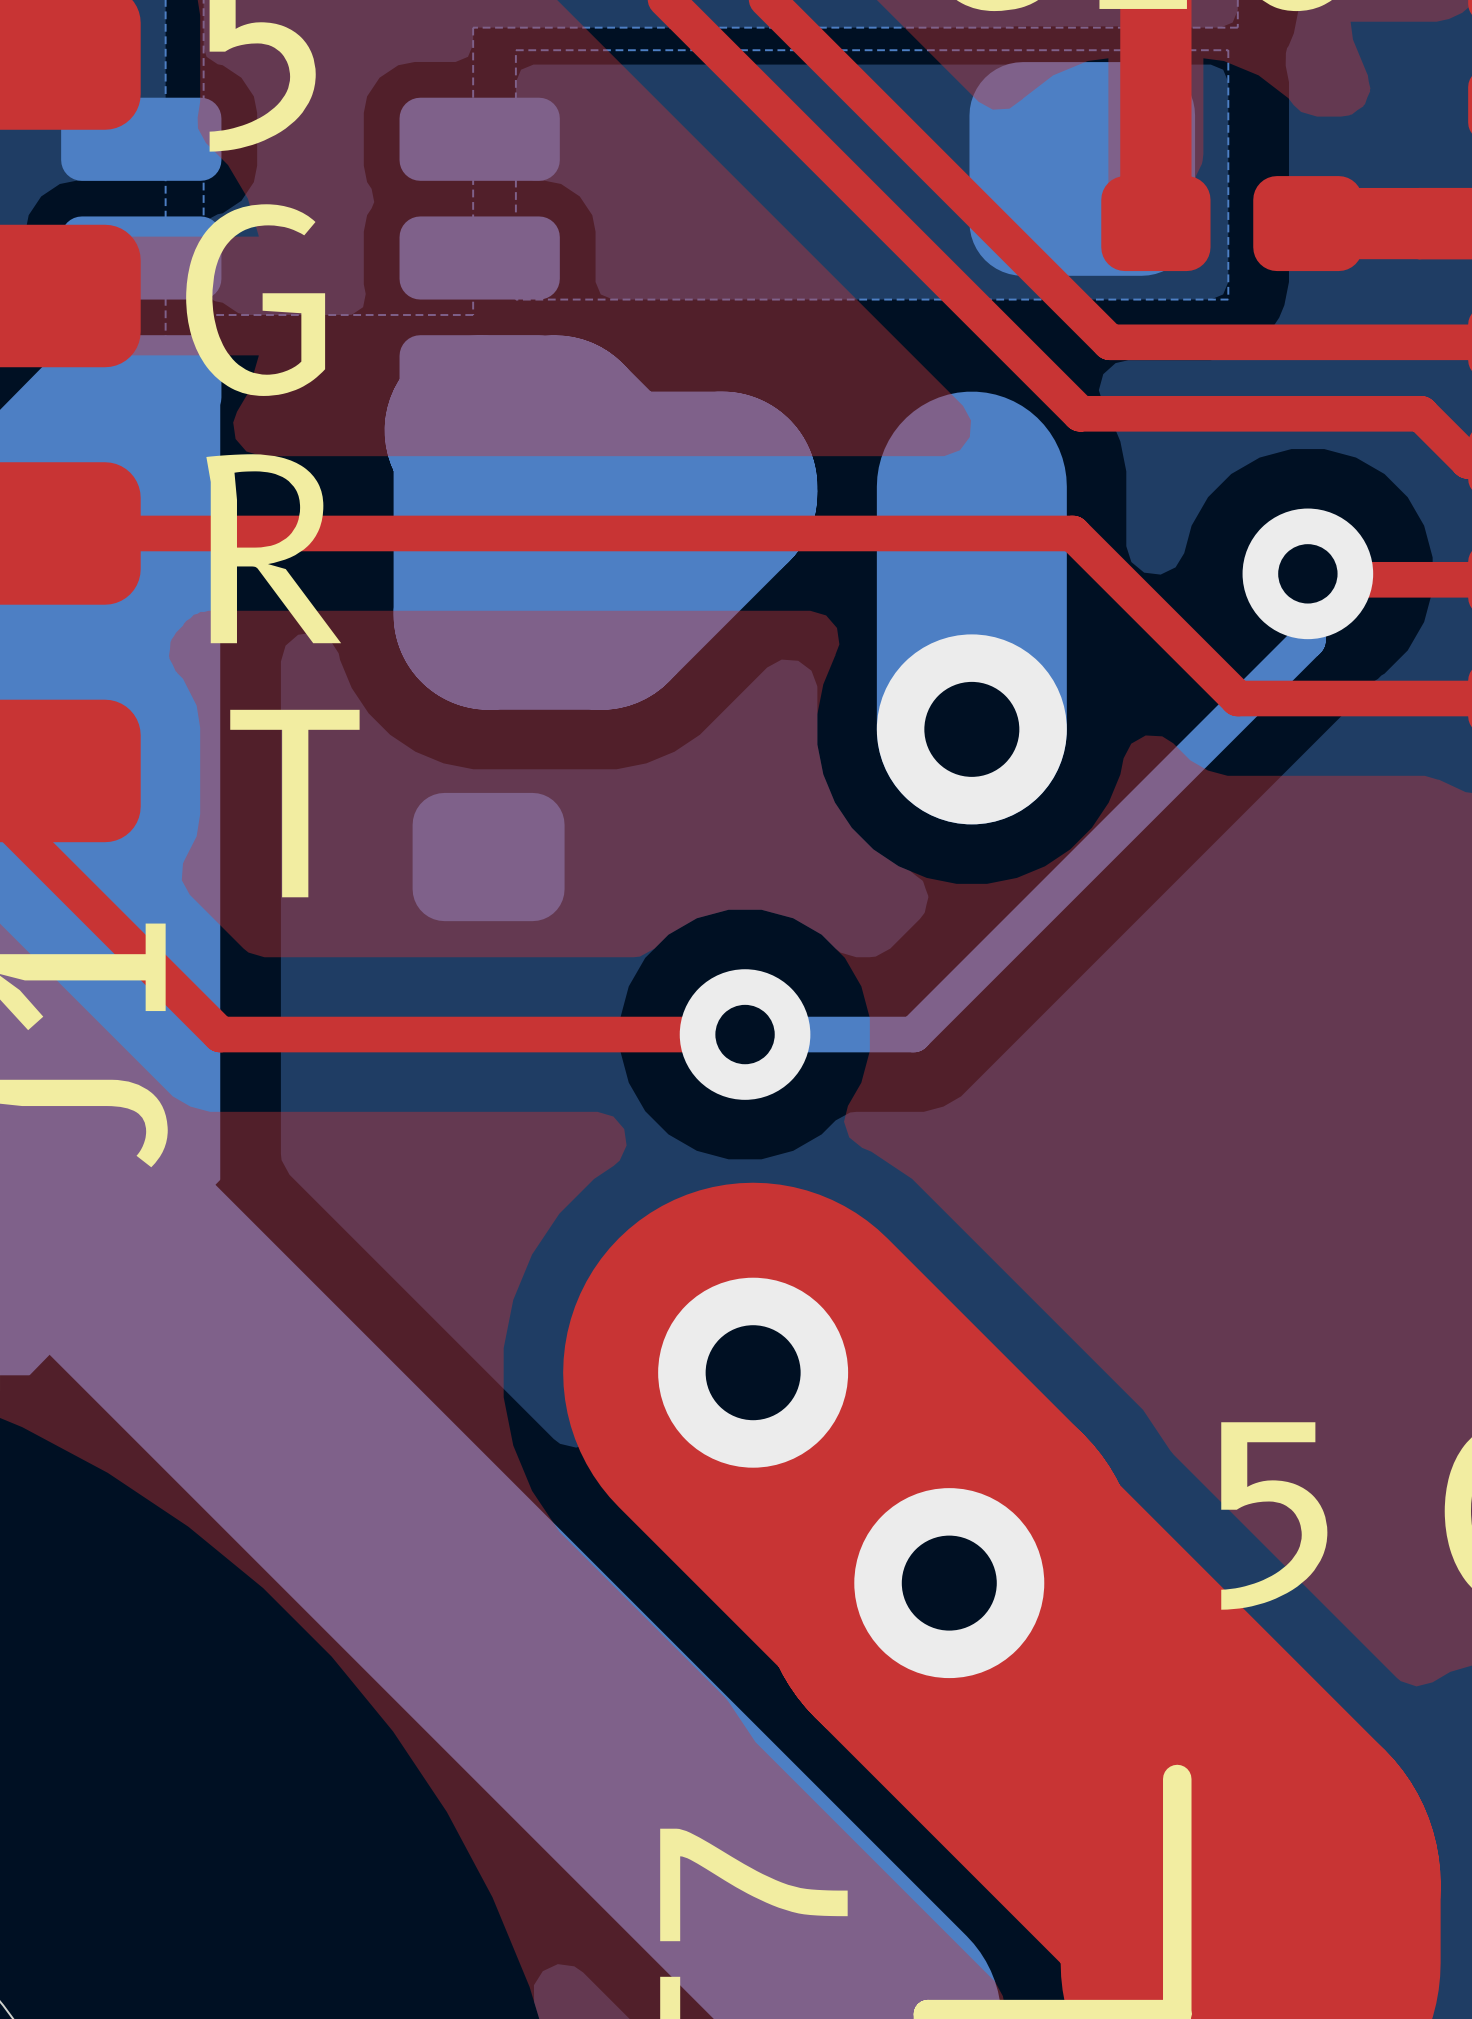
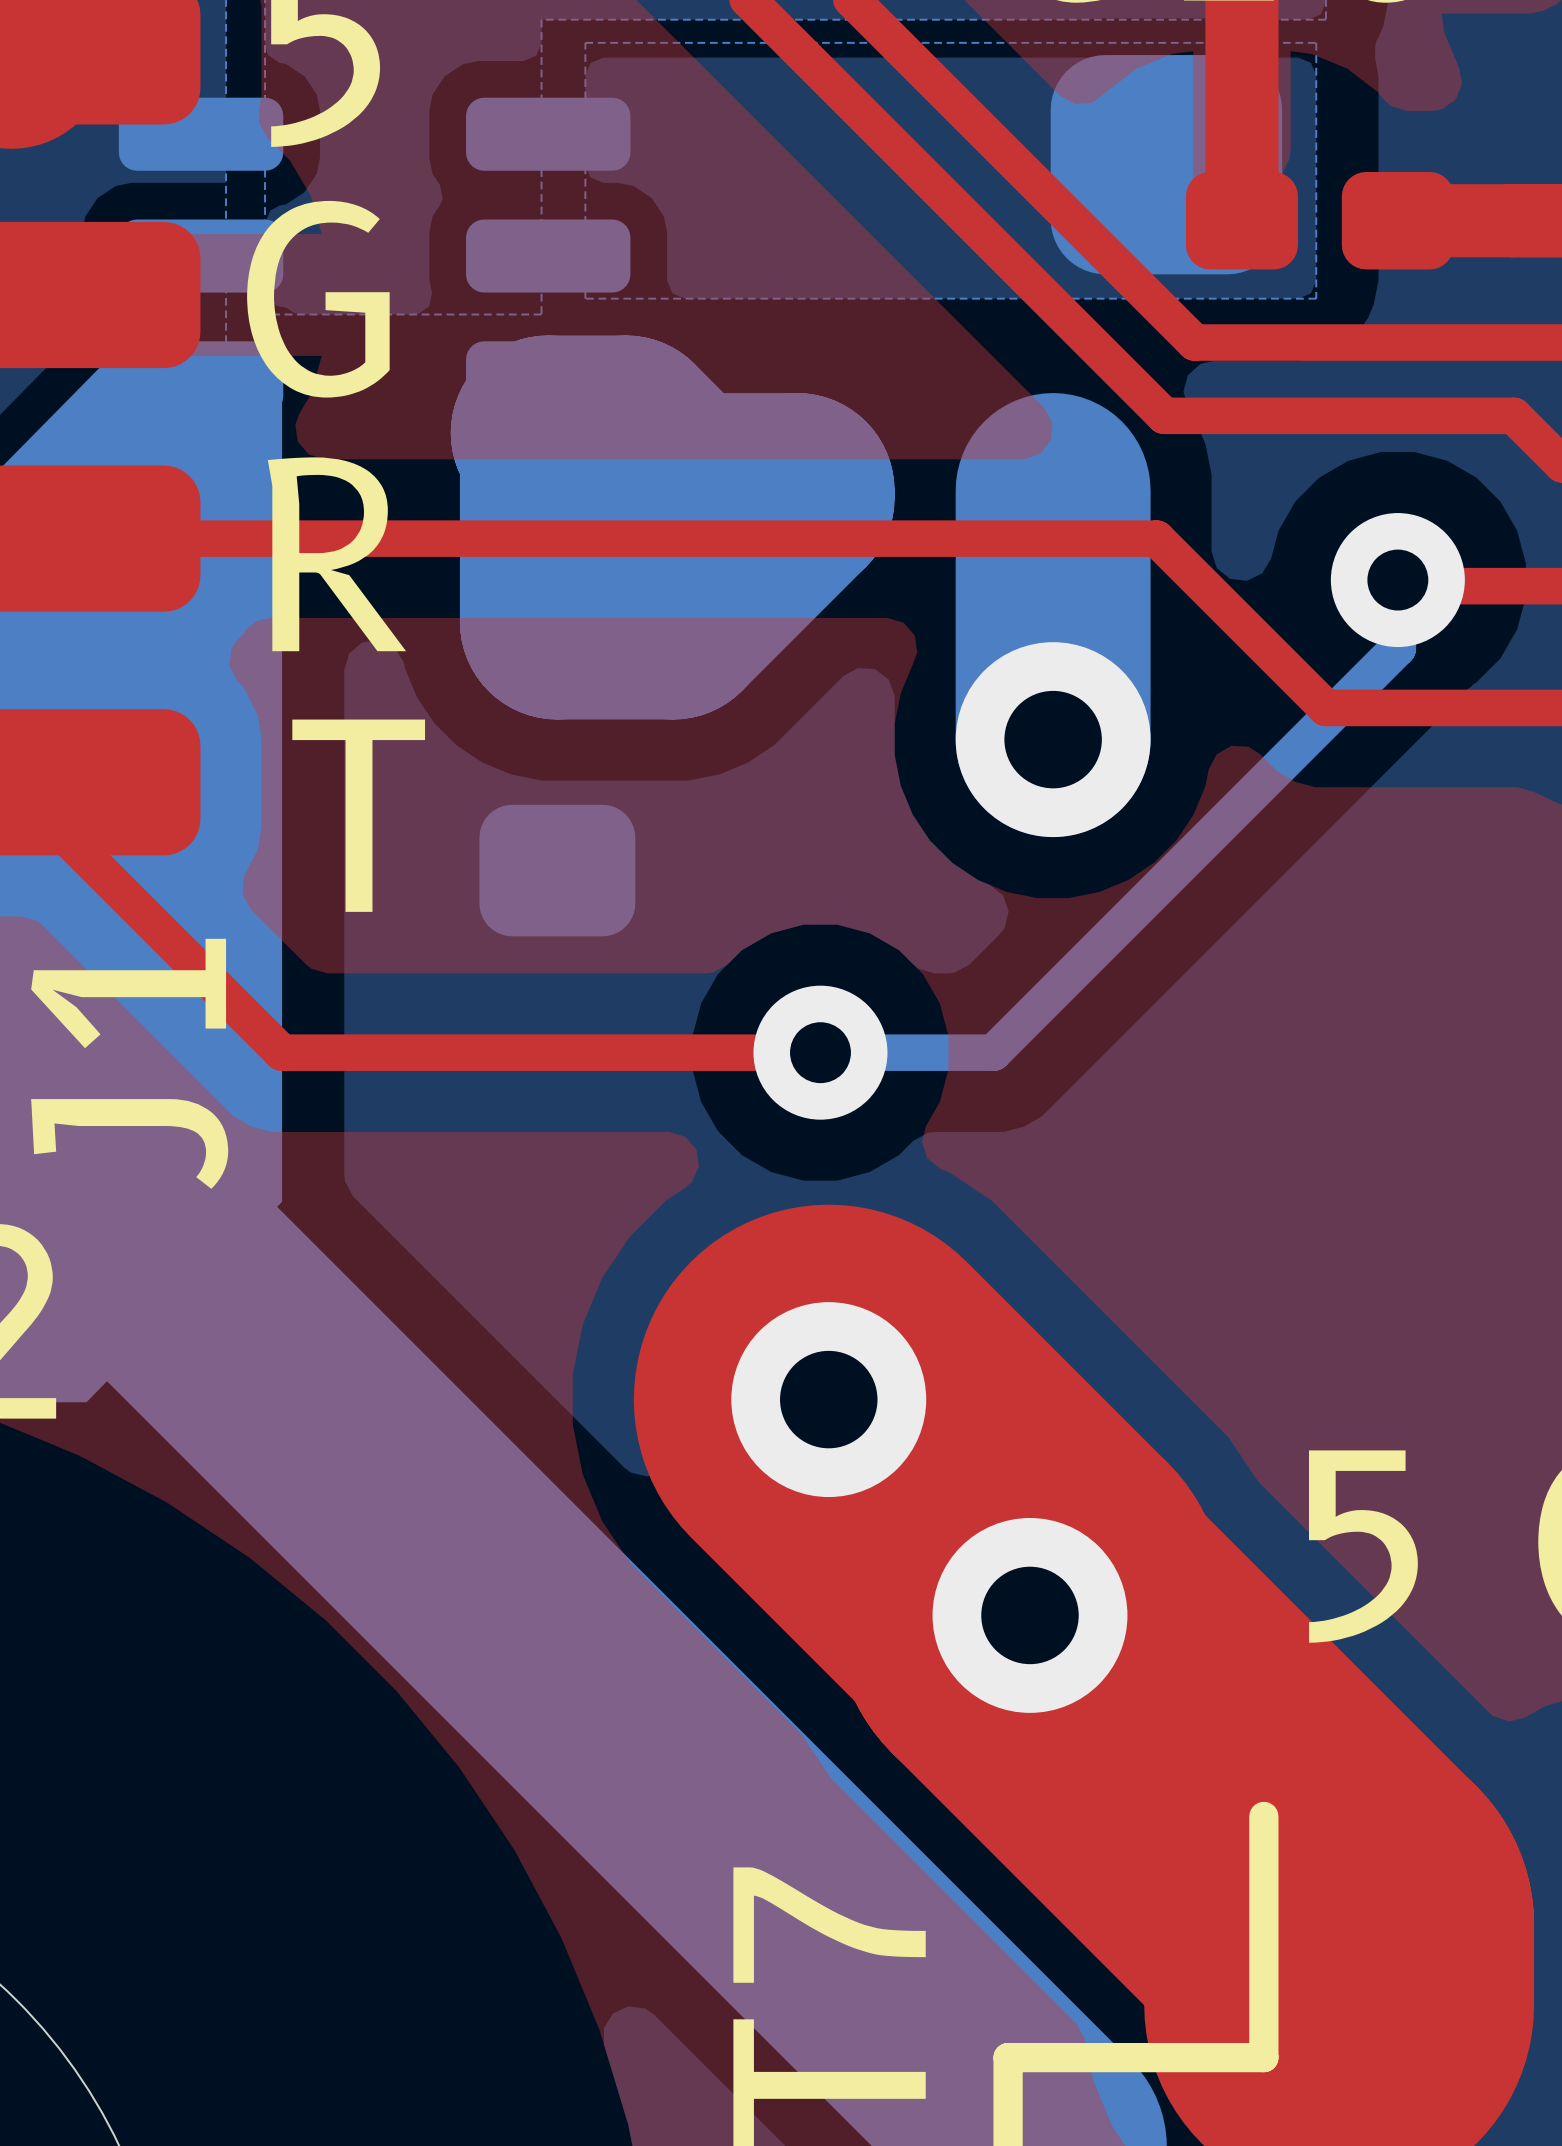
part footprint: [61, 97, 560, 419] -> [118, 97, 631, 415]

